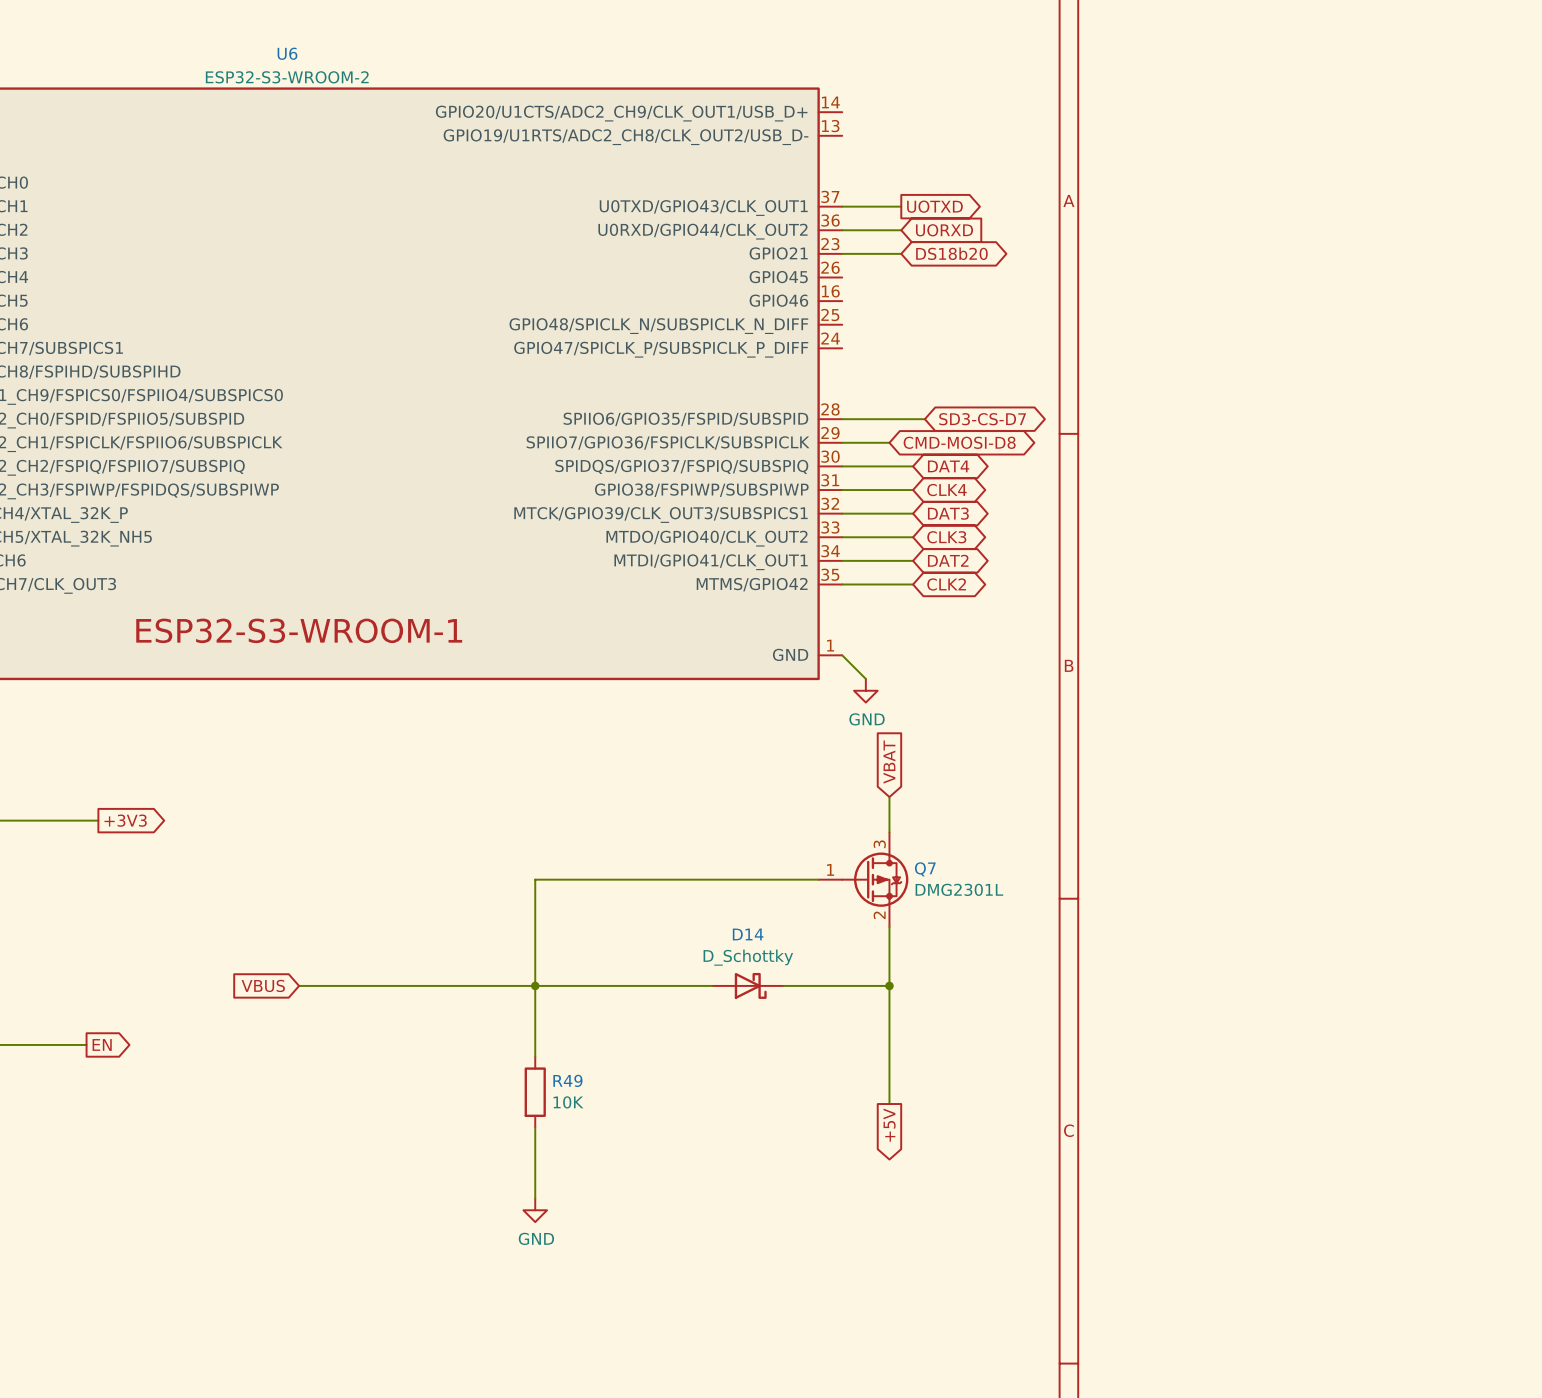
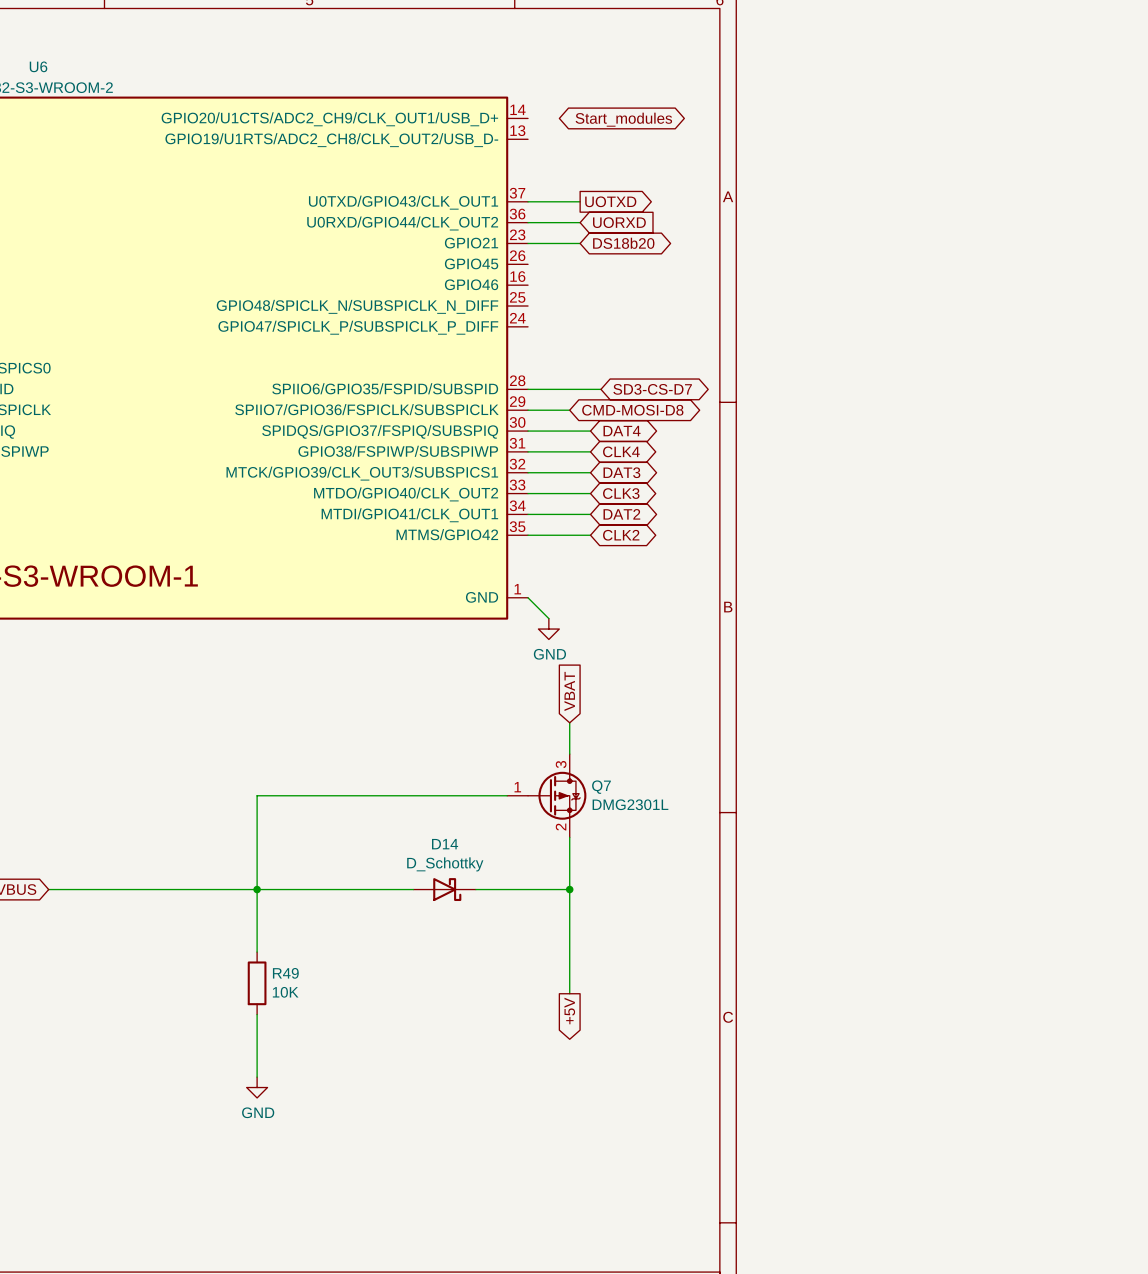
global label: none -> Start_modules (623, 119)

